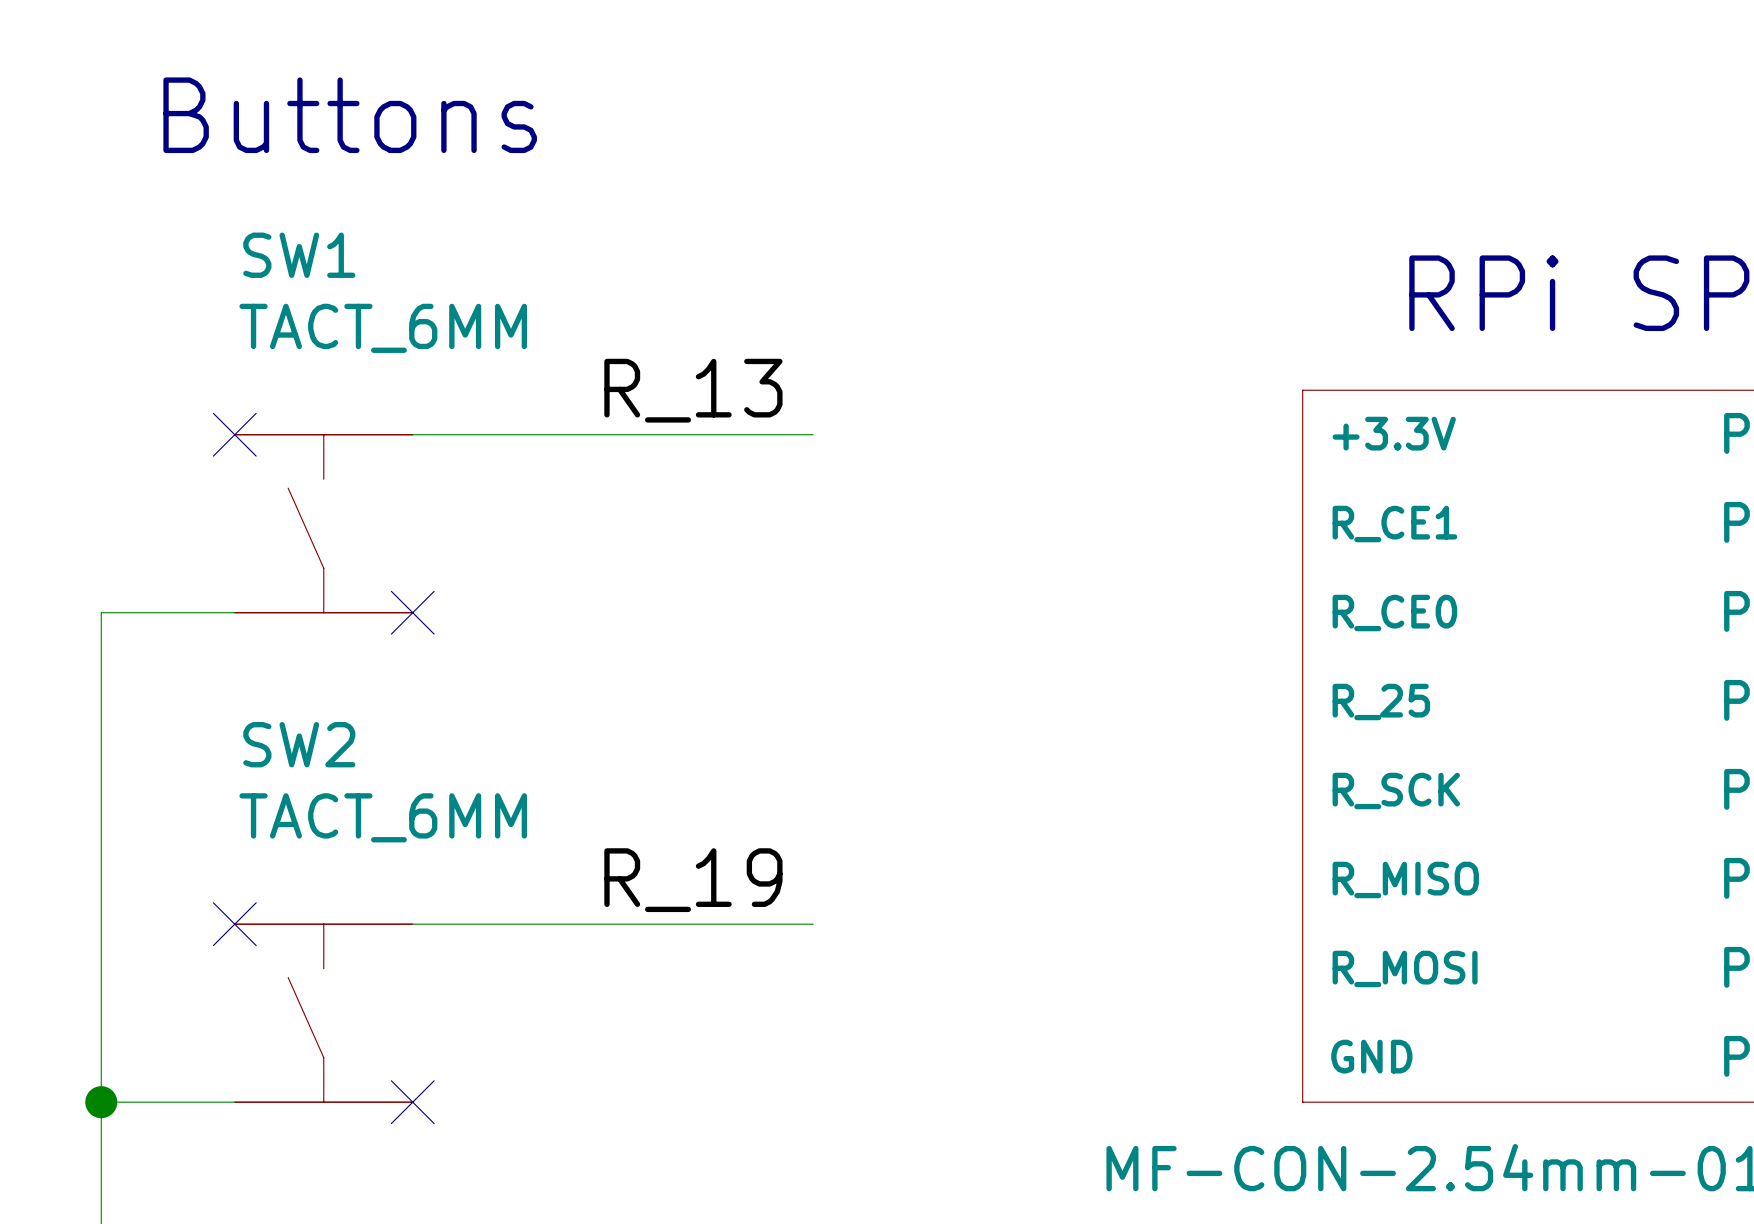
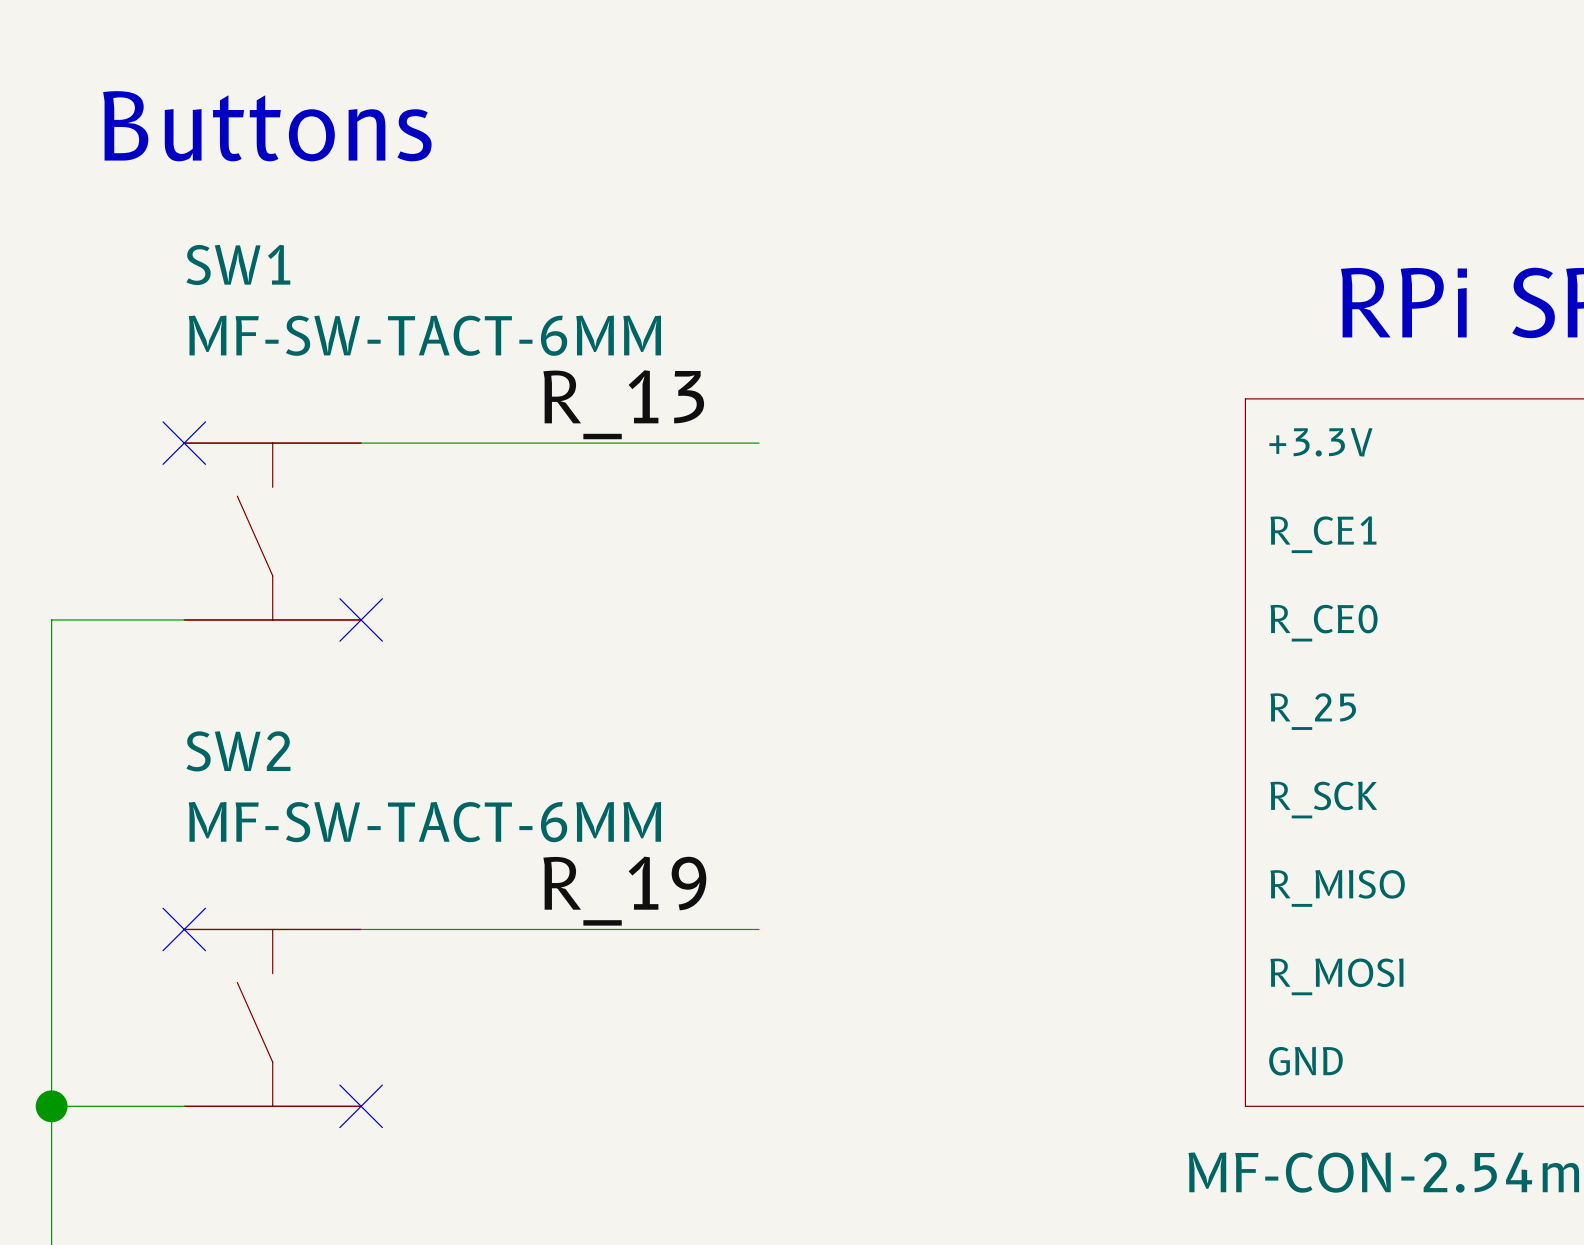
SW1 value: TACT_6MM (383, 328) -> MF-SW-TACT-6MM (424, 335)
SW2 value: TACT_6MM (383, 817) -> MF-SW-TACT-6MM (424, 822)

